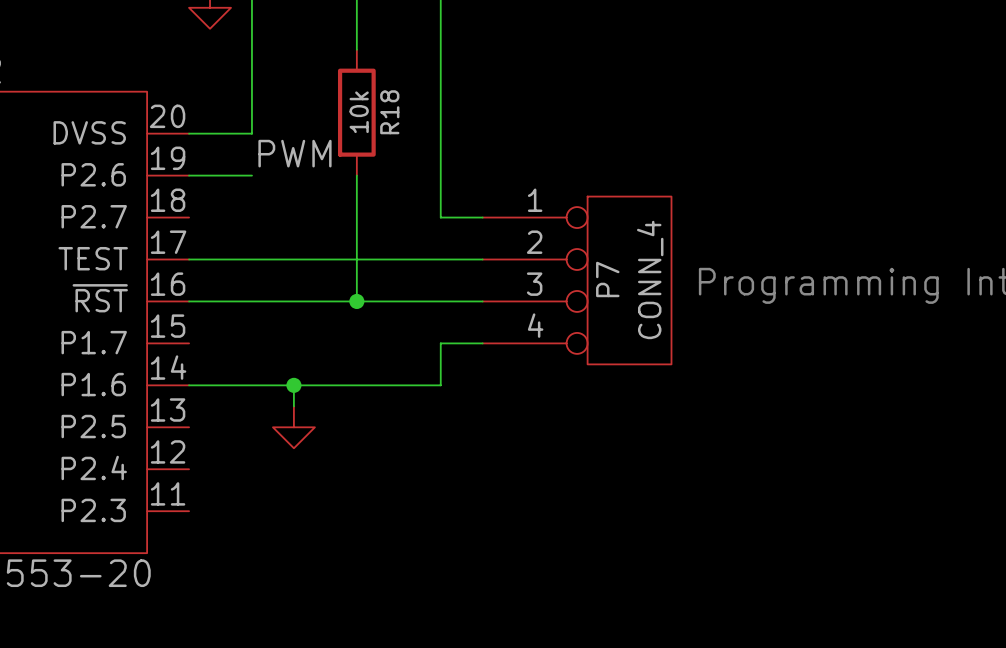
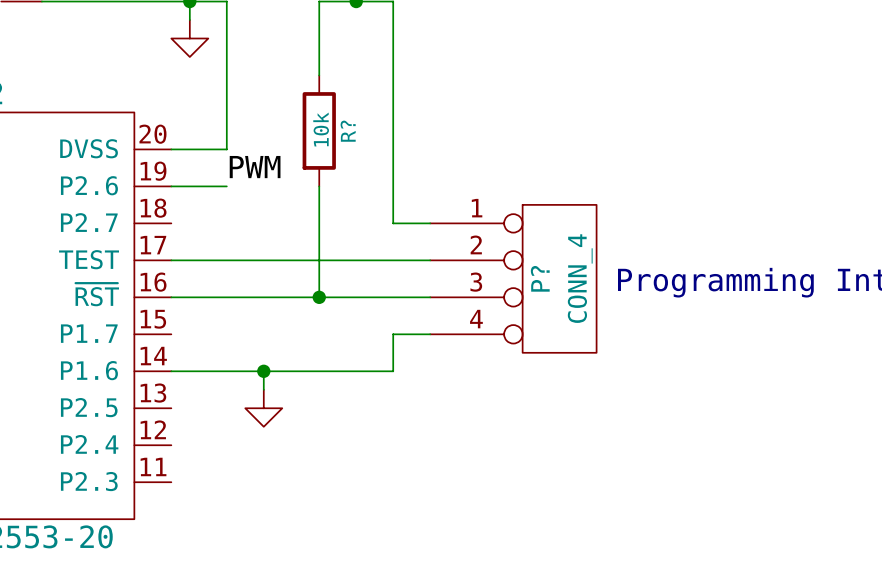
R18 name: R18 (389, 112) -> R? (348, 131)
P7 name: P7 (607, 279) -> P? (540, 278)

